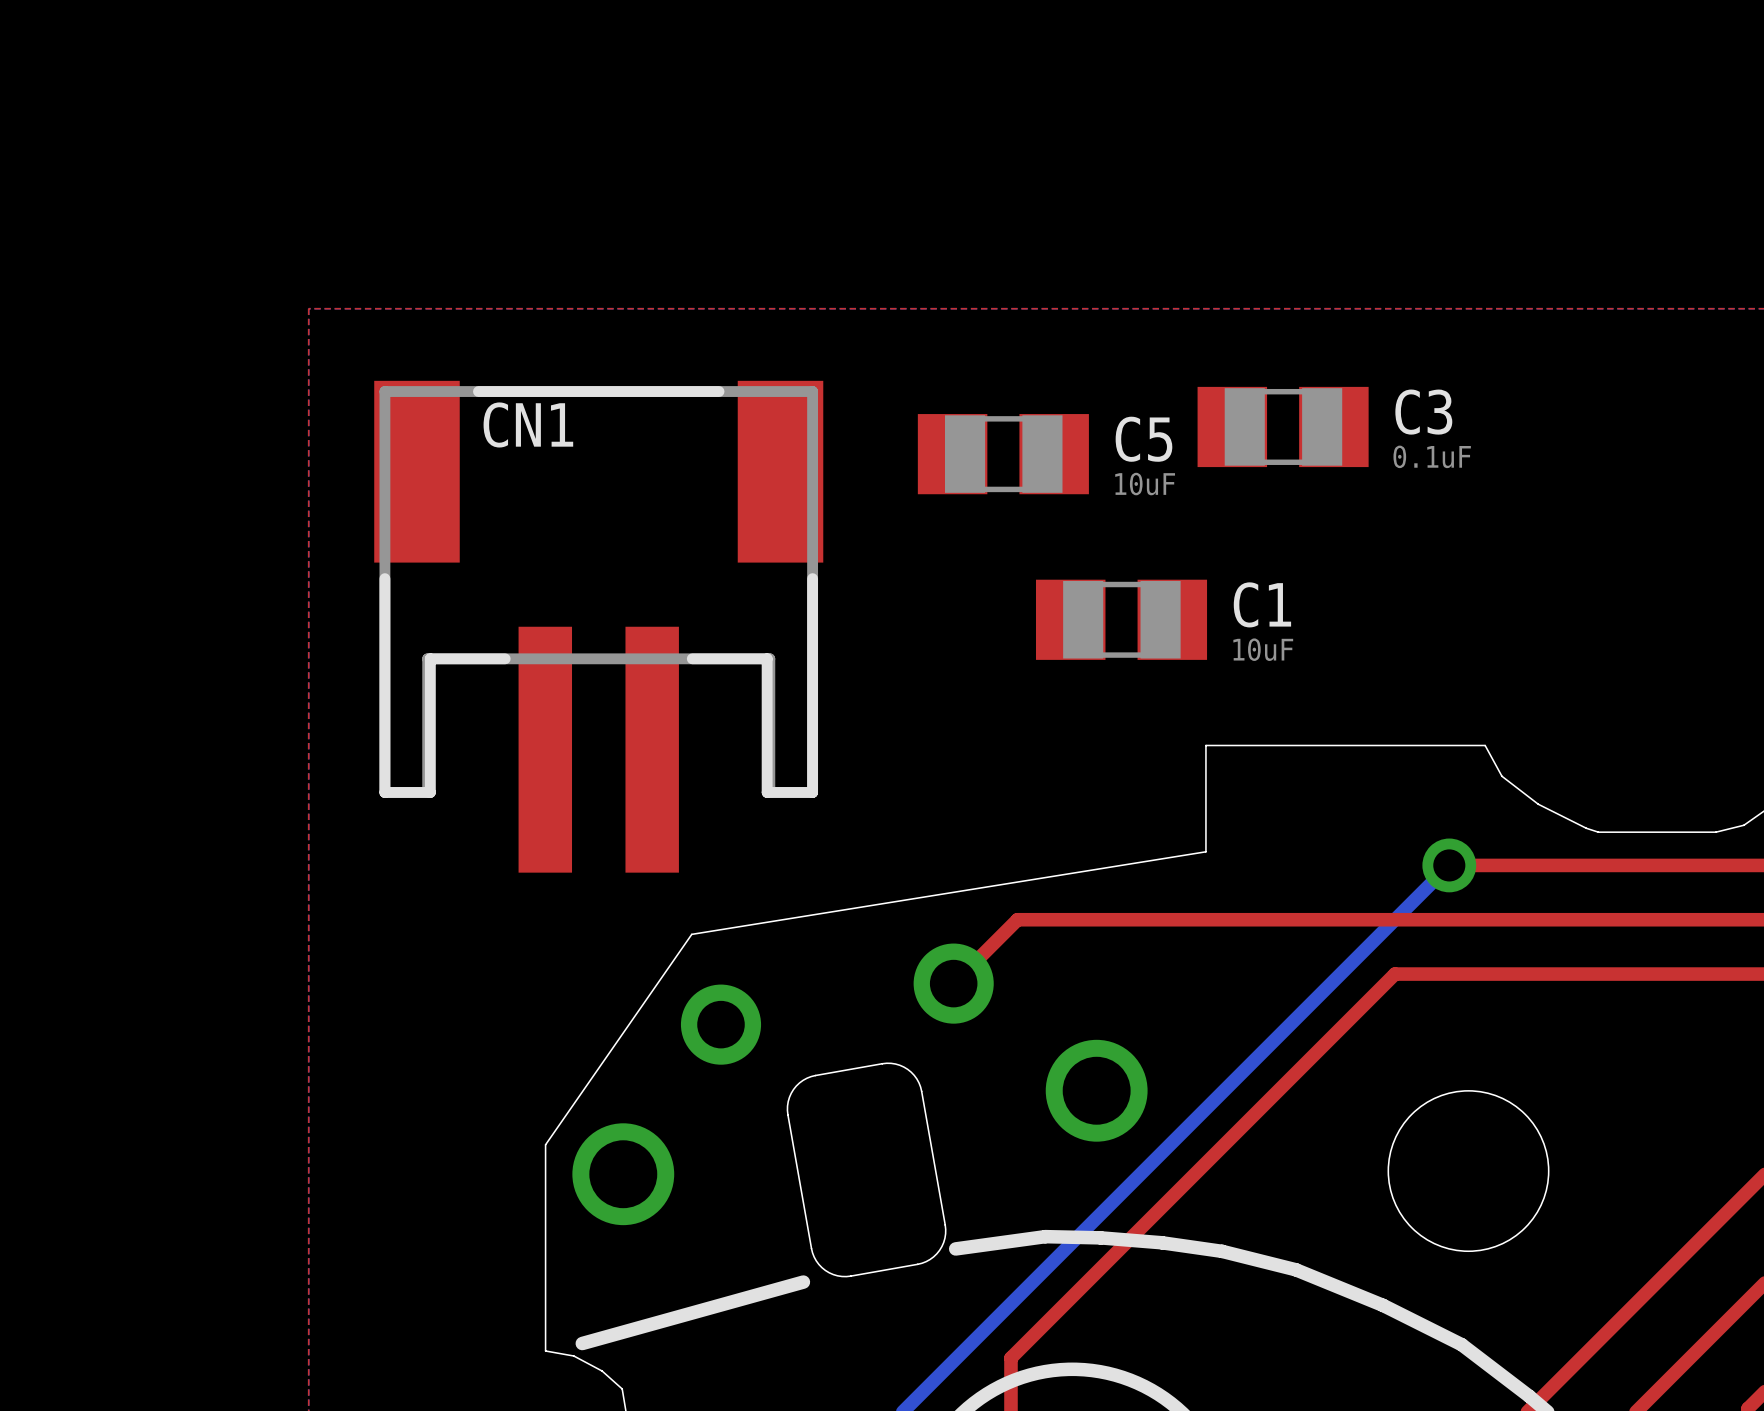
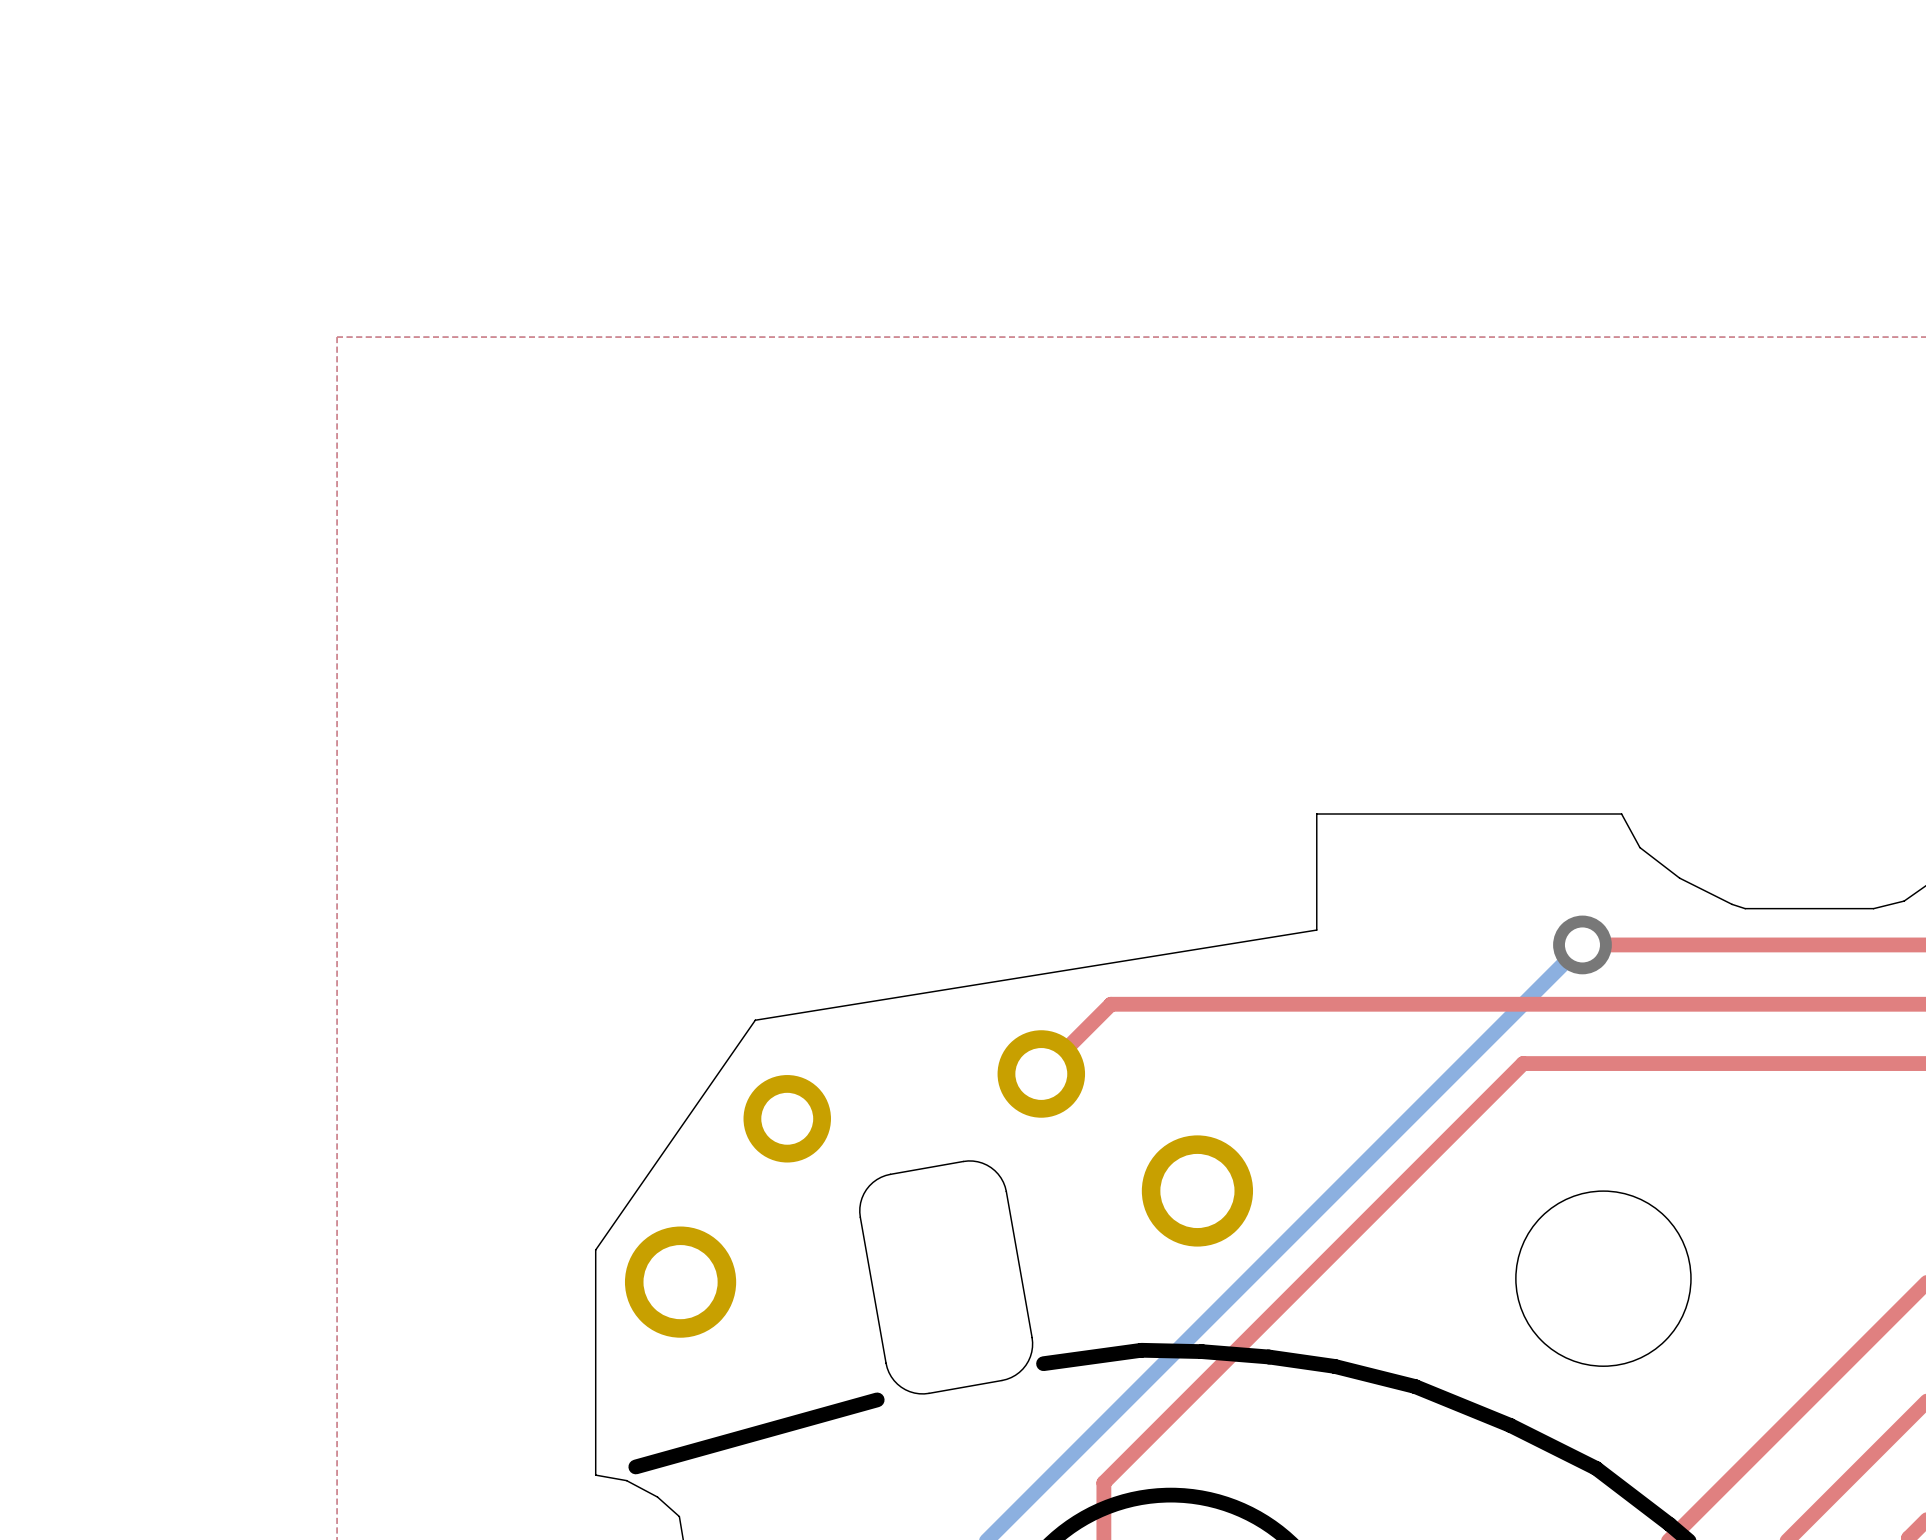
C3: 0.1uF (1283, 426) -> none
C5: 10uF (1003, 454) -> none
C1: 10uF (1121, 619) -> none
CN1: (598, 626) -> none

